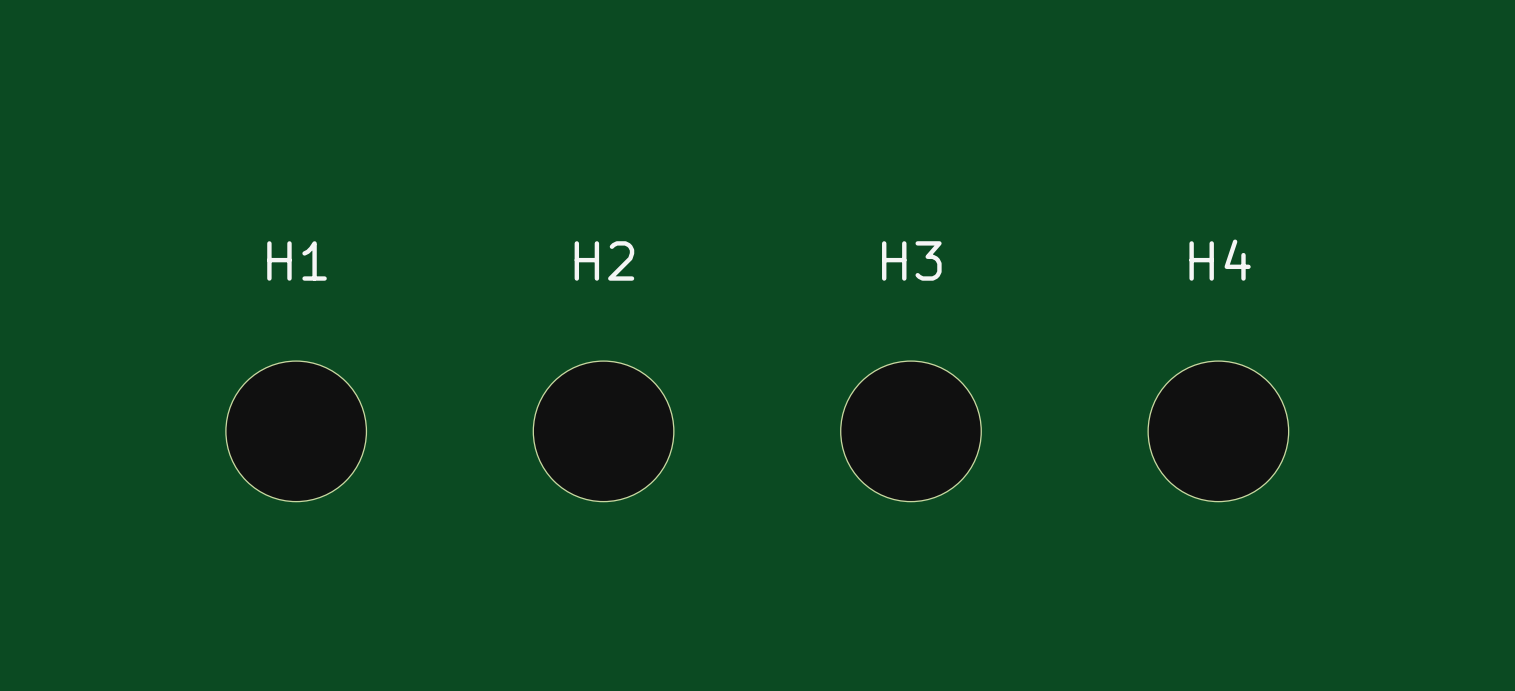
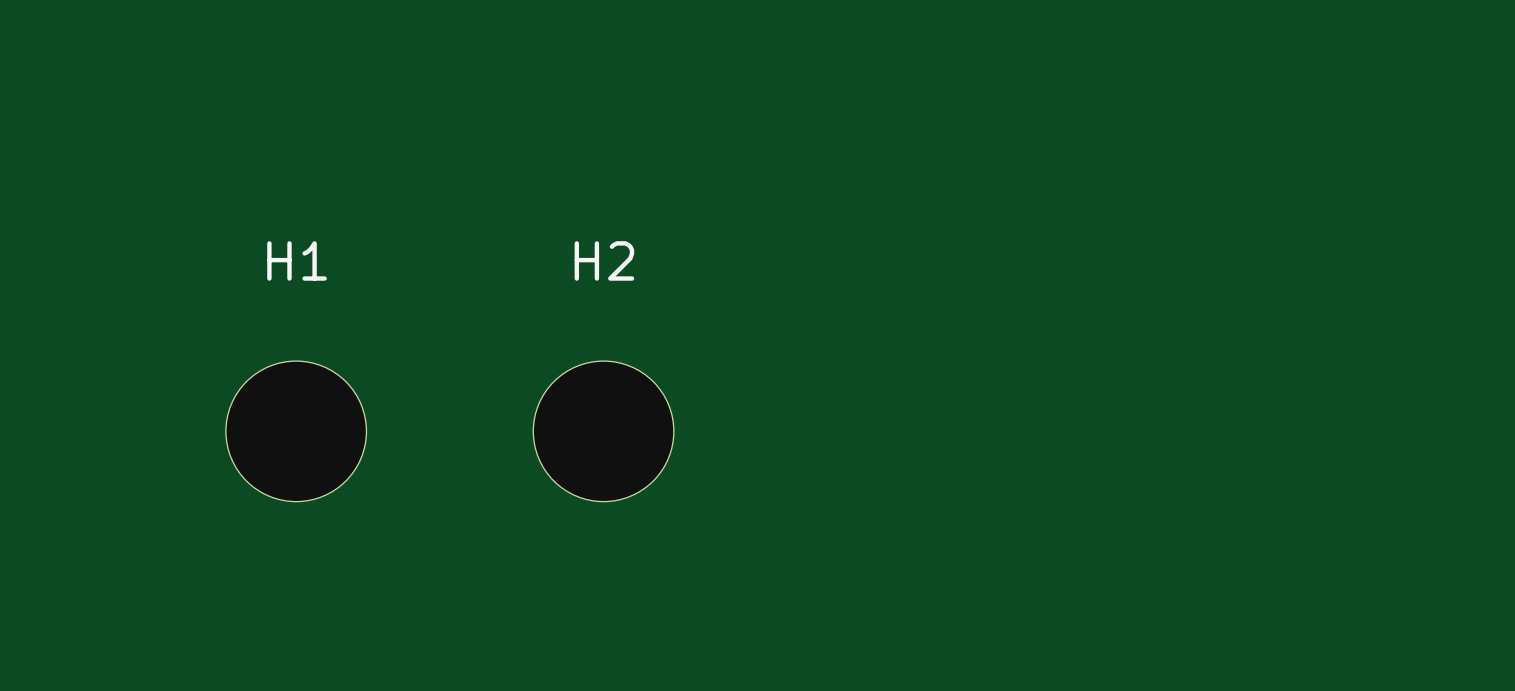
H3: (910, 431) -> none
H4: (1218, 431) -> none

